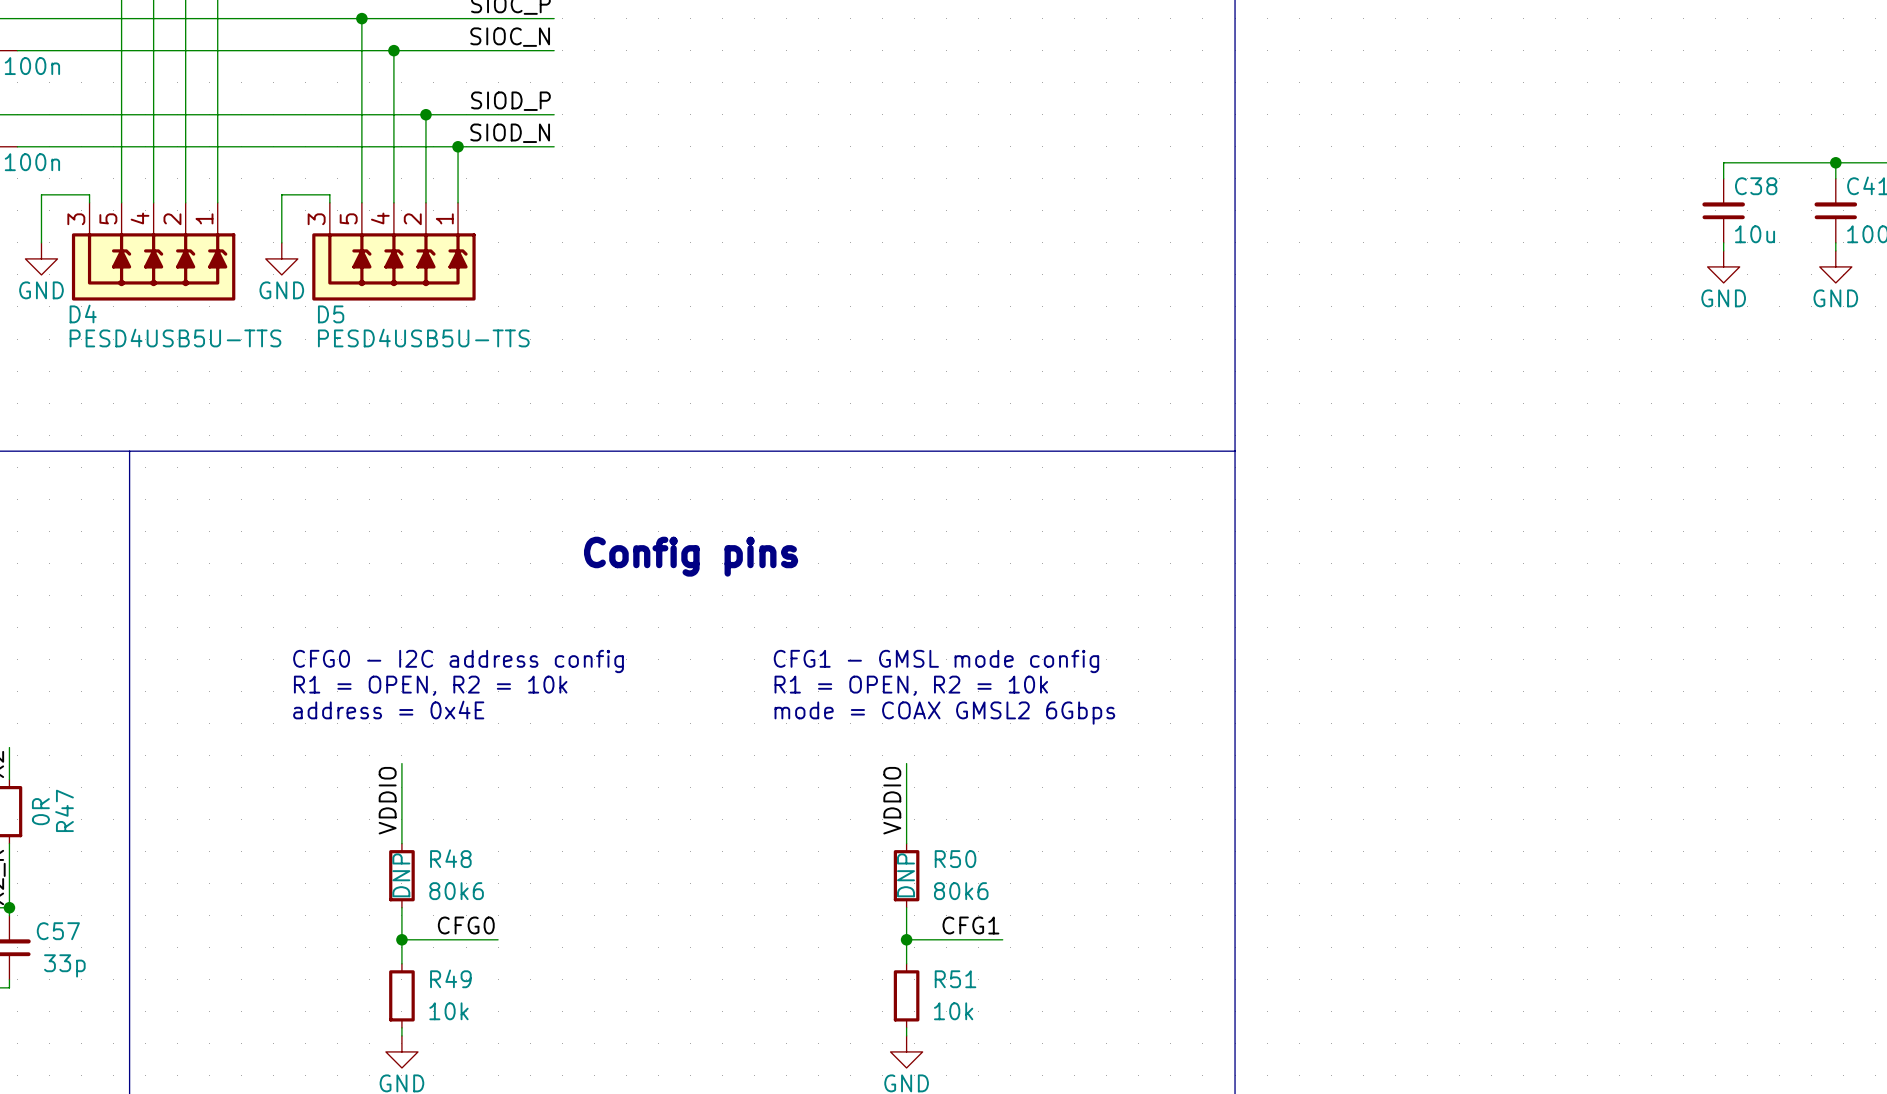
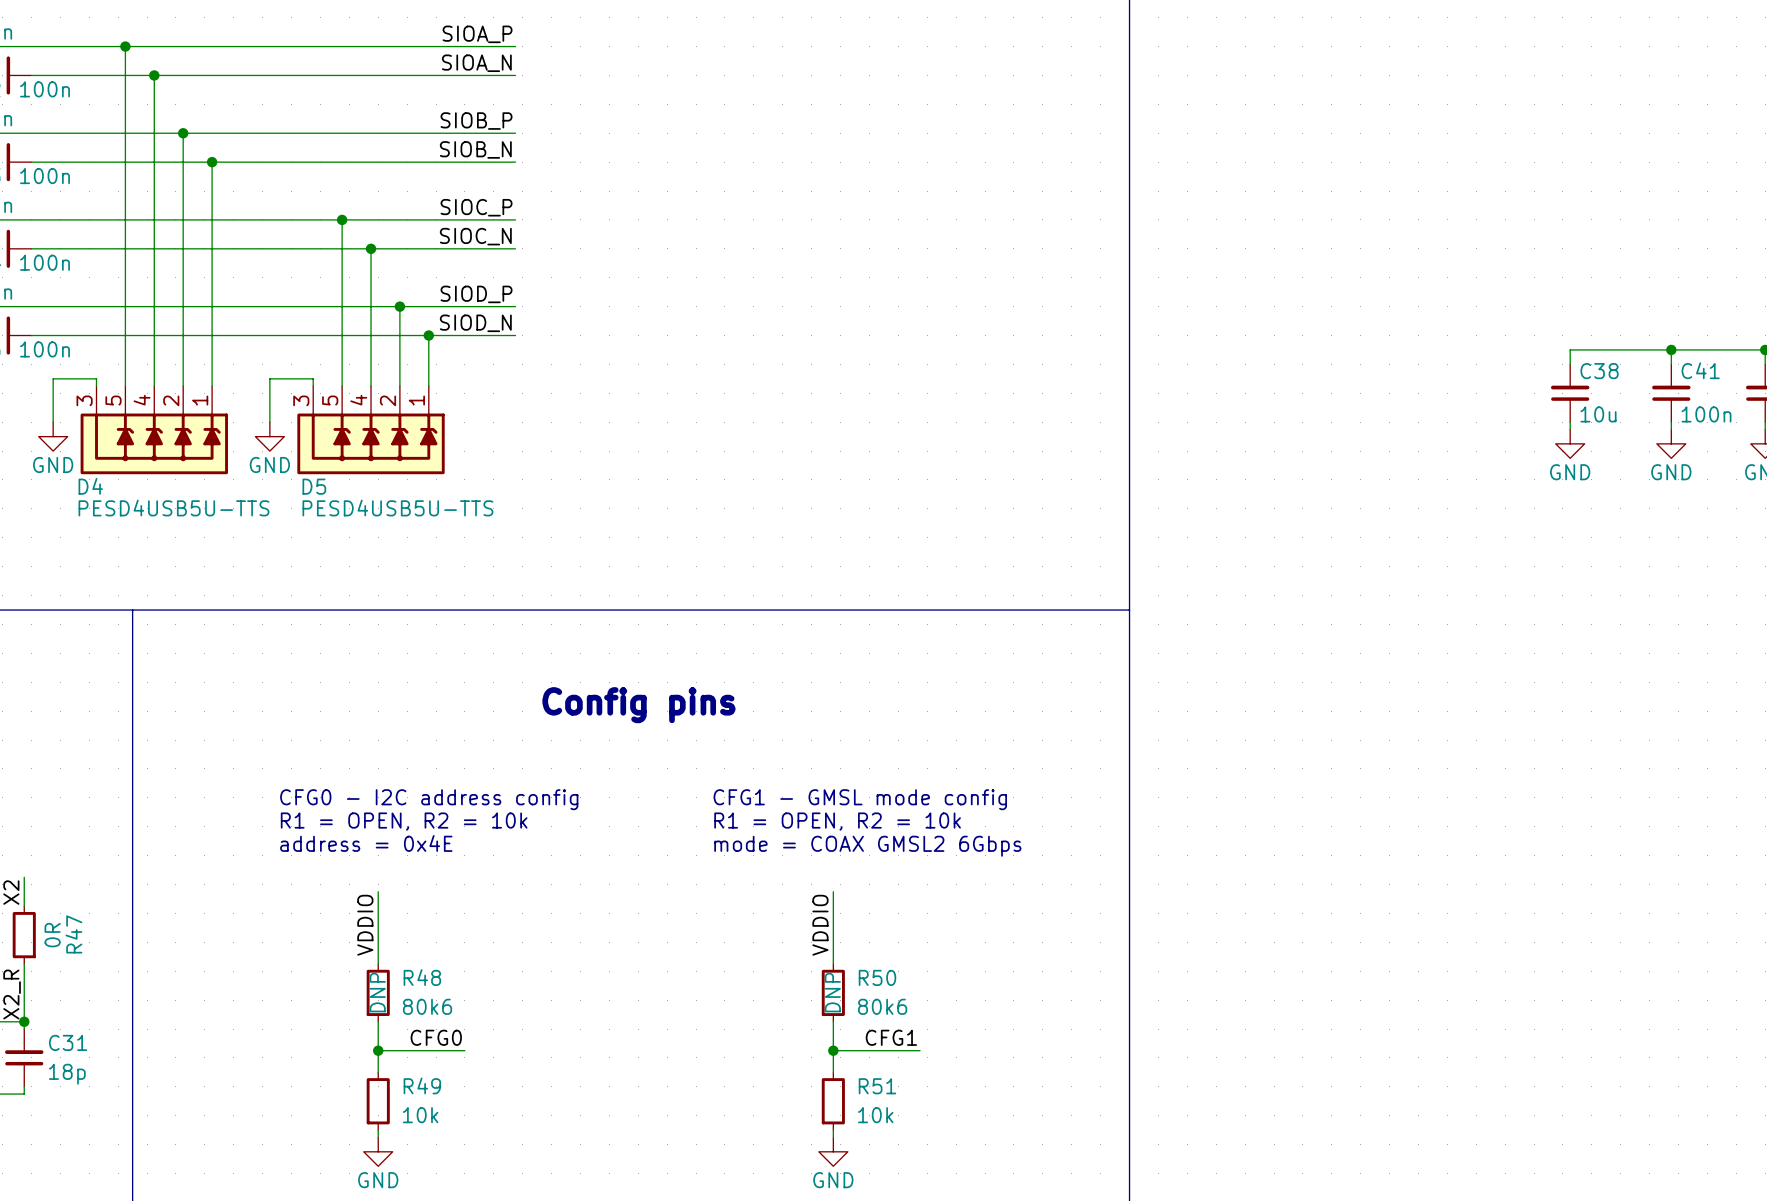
C57 name: C57 (58, 931) -> C31 (68, 1042)
C57 text: 33p (64, 965) -> 18p (67, 1074)

